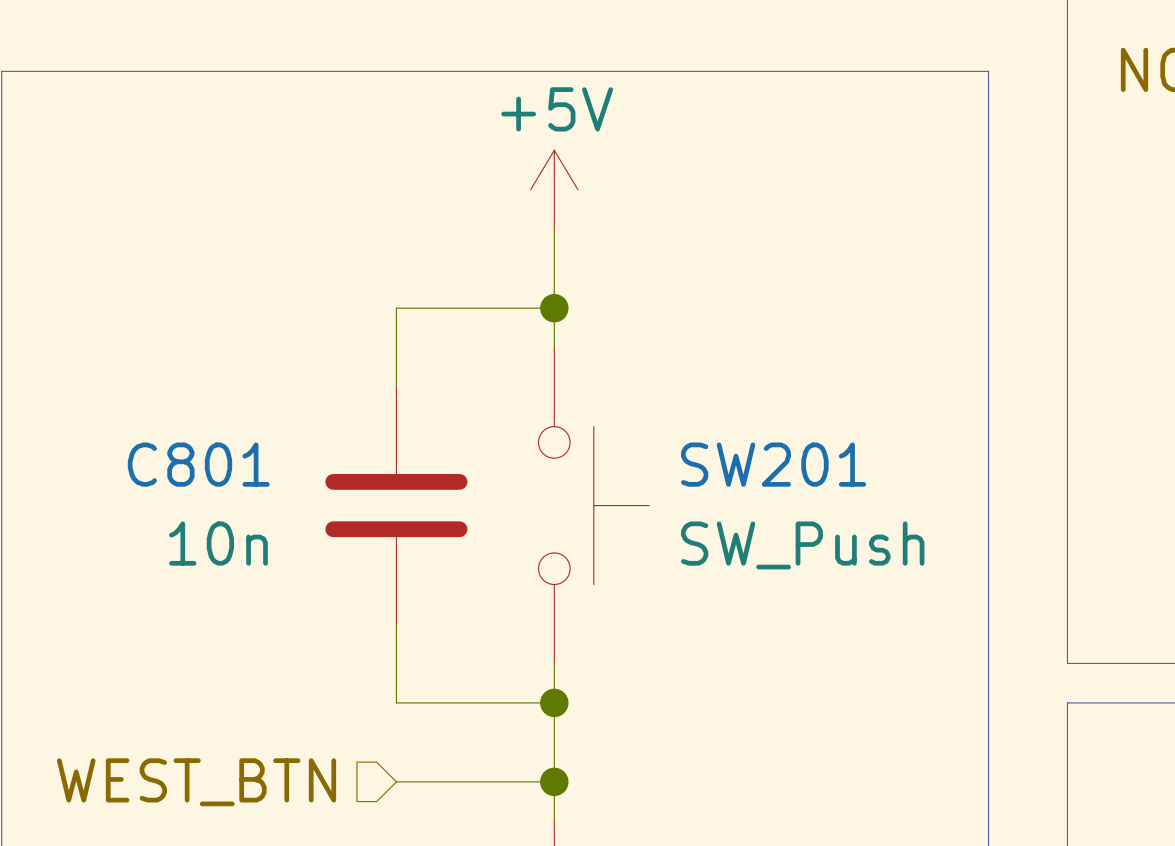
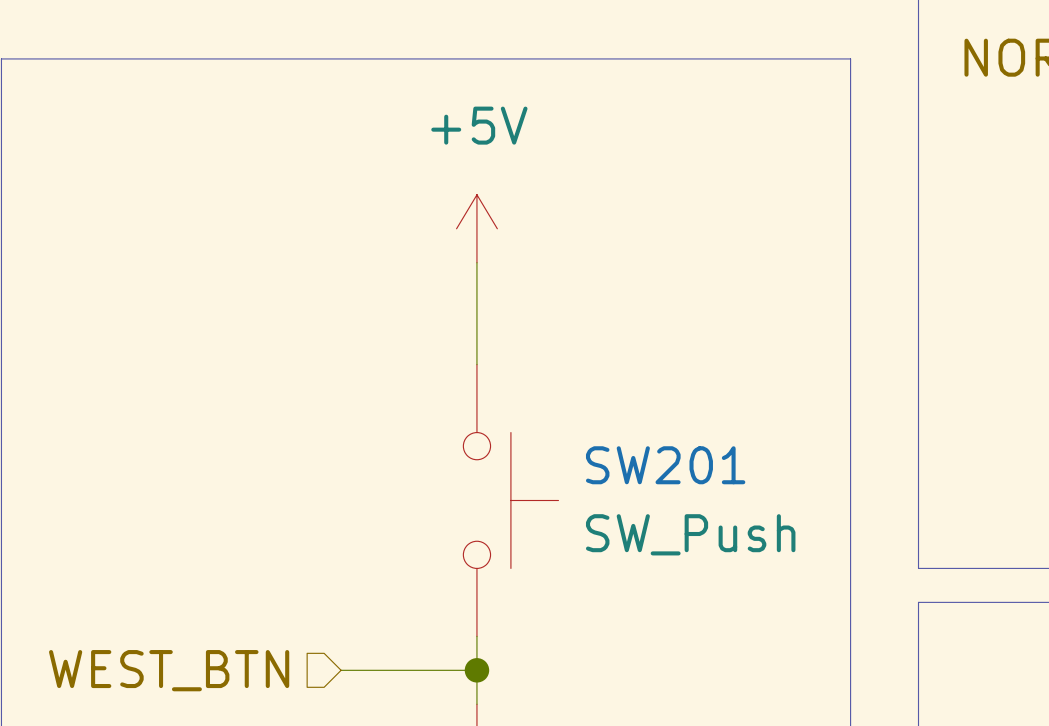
power symbol text position: +5V (557, 109) -> +5V (479, 125)
power symbol position: +5V (554, 189) -> +5V (476, 228)
wire: (554, 229) (554, 308) (396, 308) (396, 387) -> none
junction: (554, 308) -> none
C801: 10n (396, 505) -> none
SW201 position: (593, 505) -> (510, 500)
wire: (396, 623) (396, 702) (554, 702) -> none
junction: (554, 702) -> none

